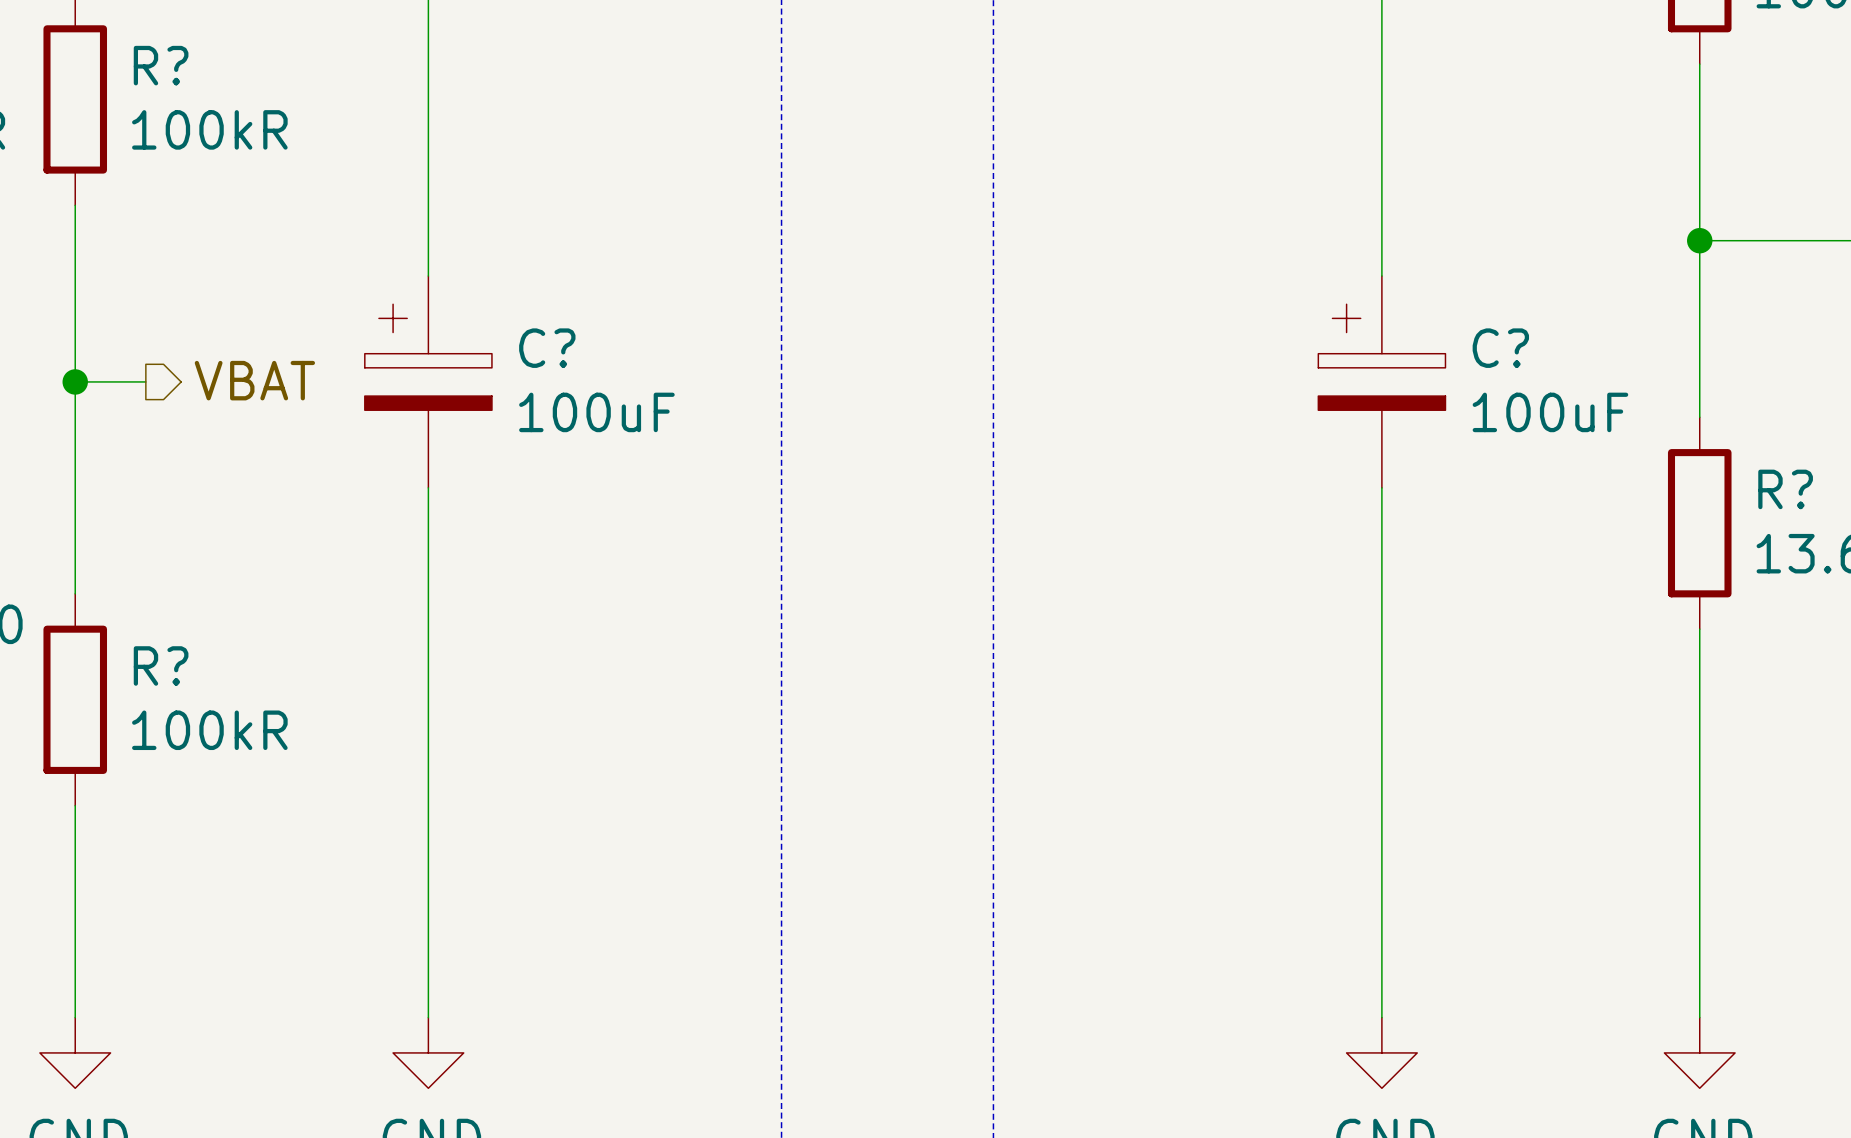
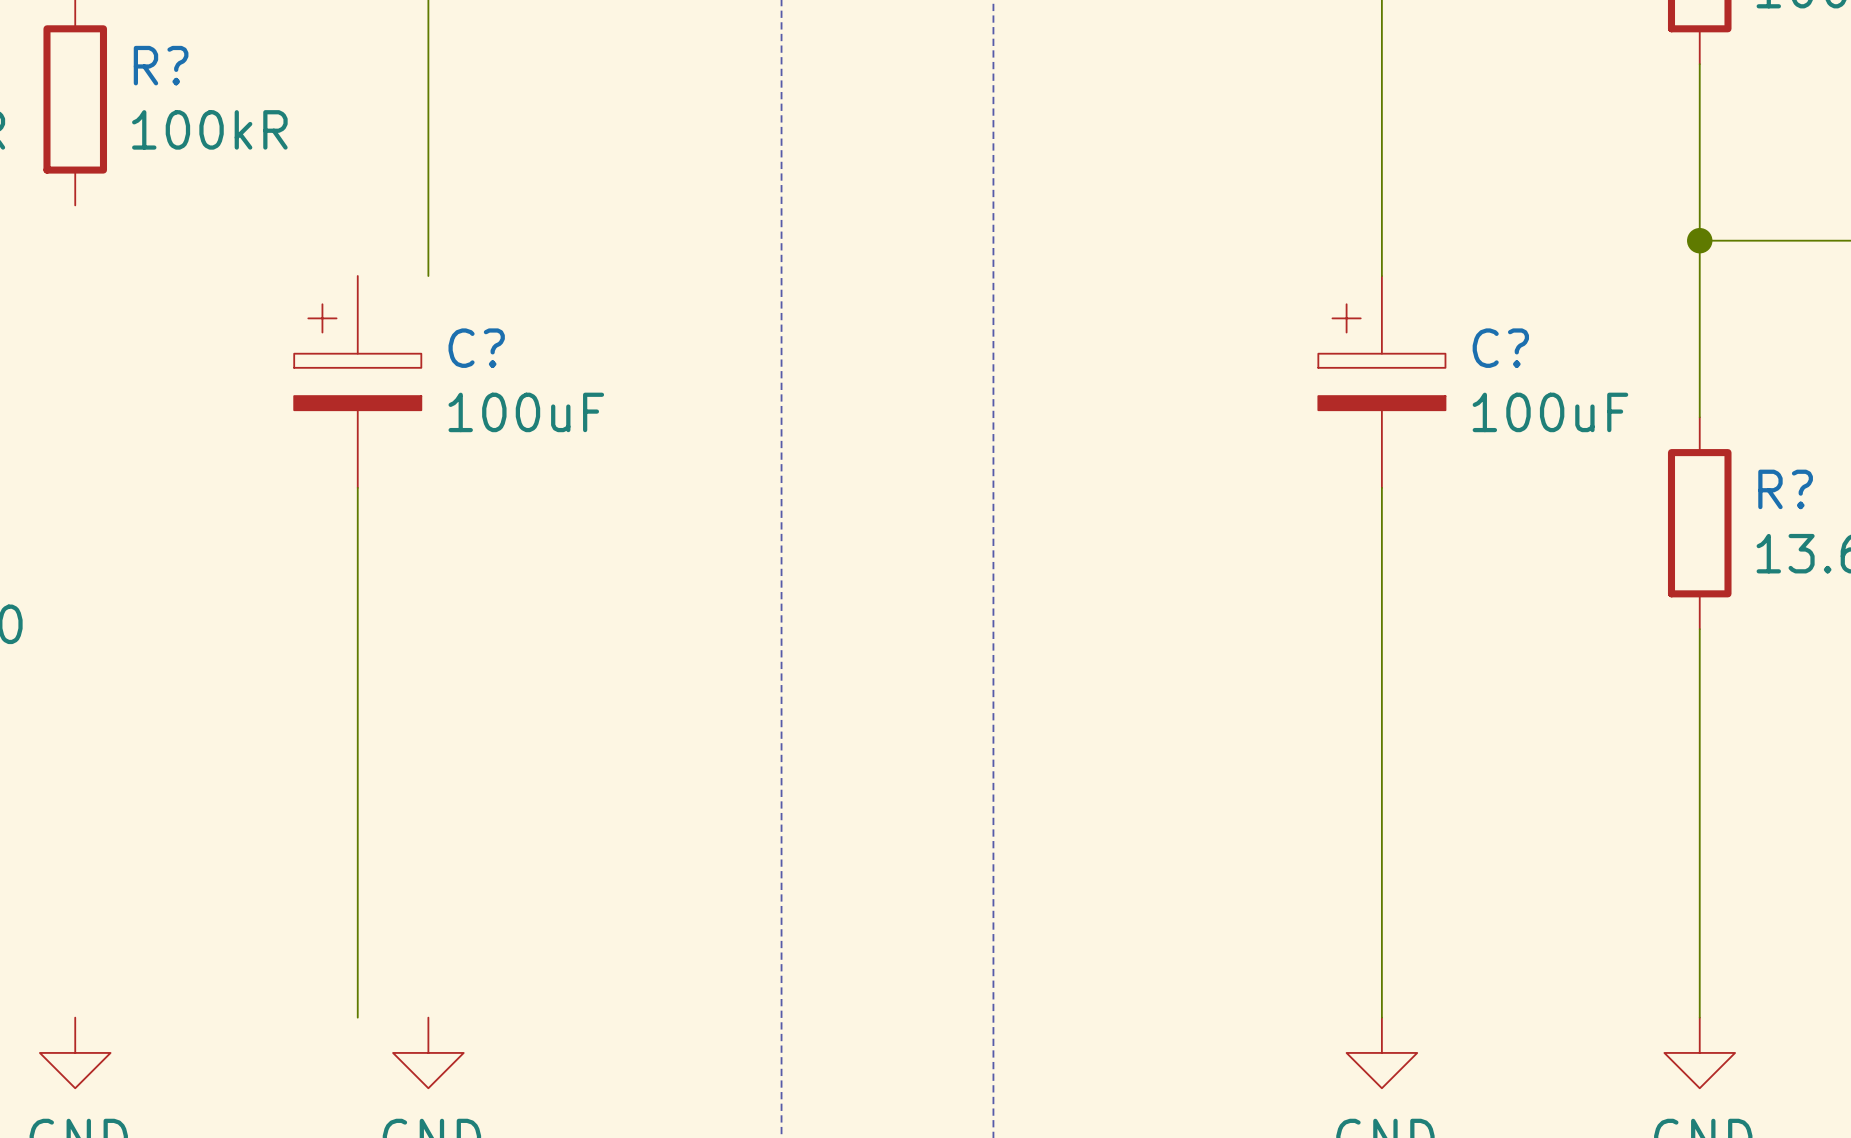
wire: (75, 205) (75, 593) -> none
hierarchical label: VBAT (254, 380) -> none
wire: (75, 381) (145, 381) -> none
junction: (75, 381) -> none
C? position: (428, 381) -> (357, 381)
wire: (428, 487) (428, 1017) -> (357, 487) (357, 1017)
R?: 100kR (75, 699) -> none
wire: (75, 805) (75, 1017) -> none

